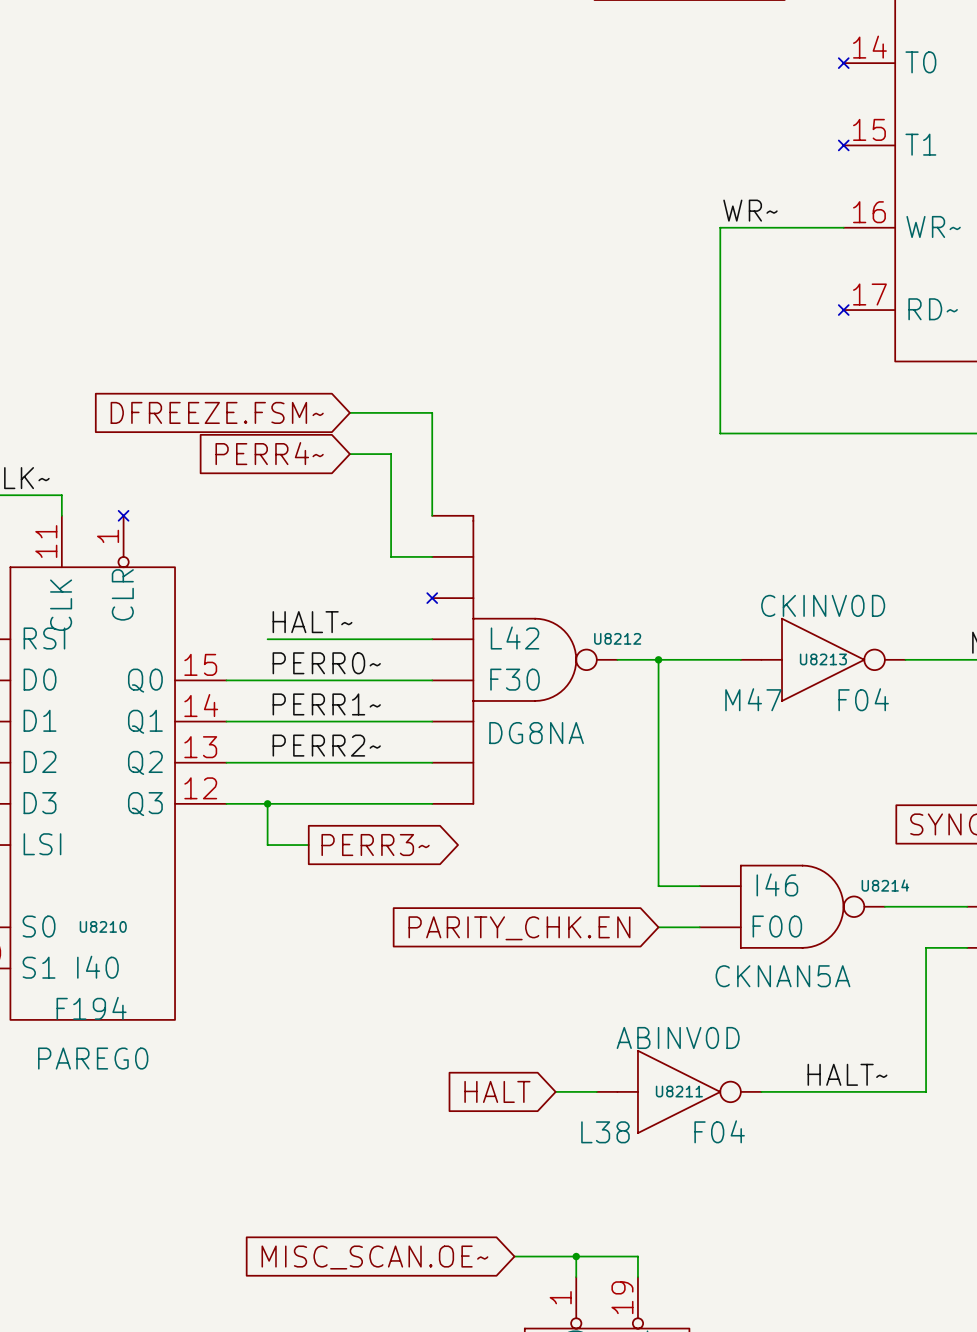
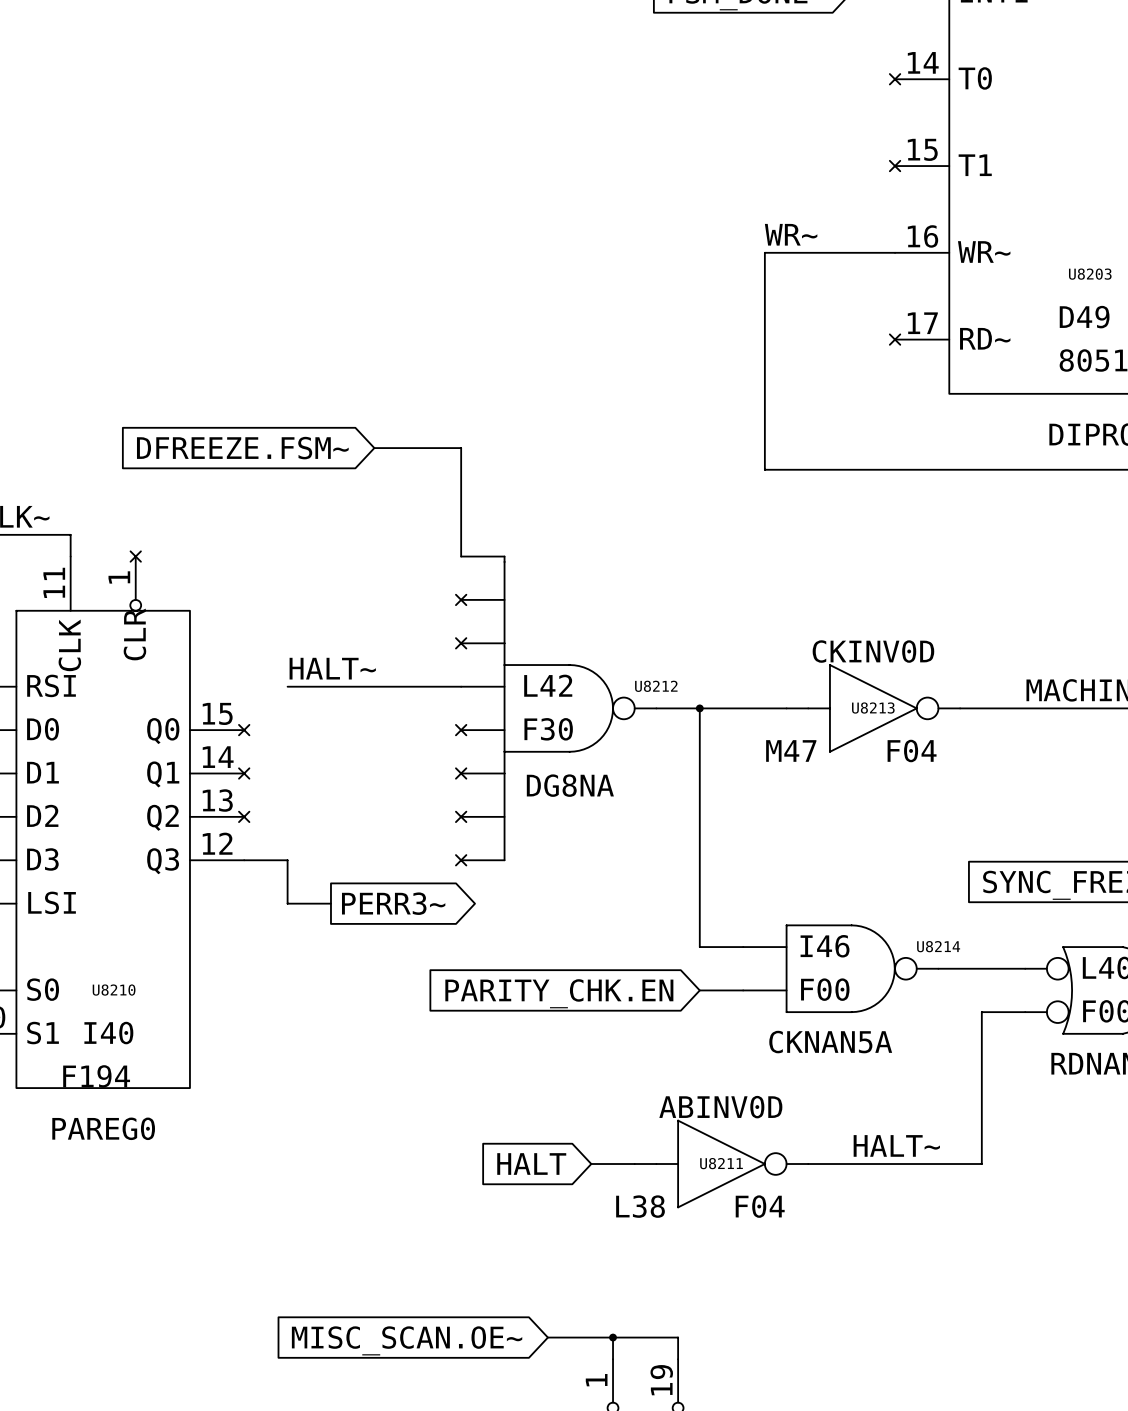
global label: PERR4~ (269, 453) -> none
wire: (349, 454) (391, 454) (391, 556) (432, 556) -> none
no-connect mark: none -> (461, 599)
label: PERR0~ (326, 663) -> none
wire: (226, 680) (432, 680) -> none
no-connect mark: none -> (244, 730)
no-connect mark: none -> (461, 730)
label: PERR1~ (326, 704) -> none
wire: (226, 721) (432, 721) -> none
no-connect mark: none -> (244, 773)
no-connect mark: none -> (461, 773)
label: PERR2~ (326, 745) -> none
wire: (226, 762) (432, 762) -> none
no-connect mark: none -> (244, 816)
no-connect mark: none -> (461, 816)
wire: (267, 803) (432, 803) -> none
junction: (267, 803) -> none
no-connect mark: none -> (461, 860)

